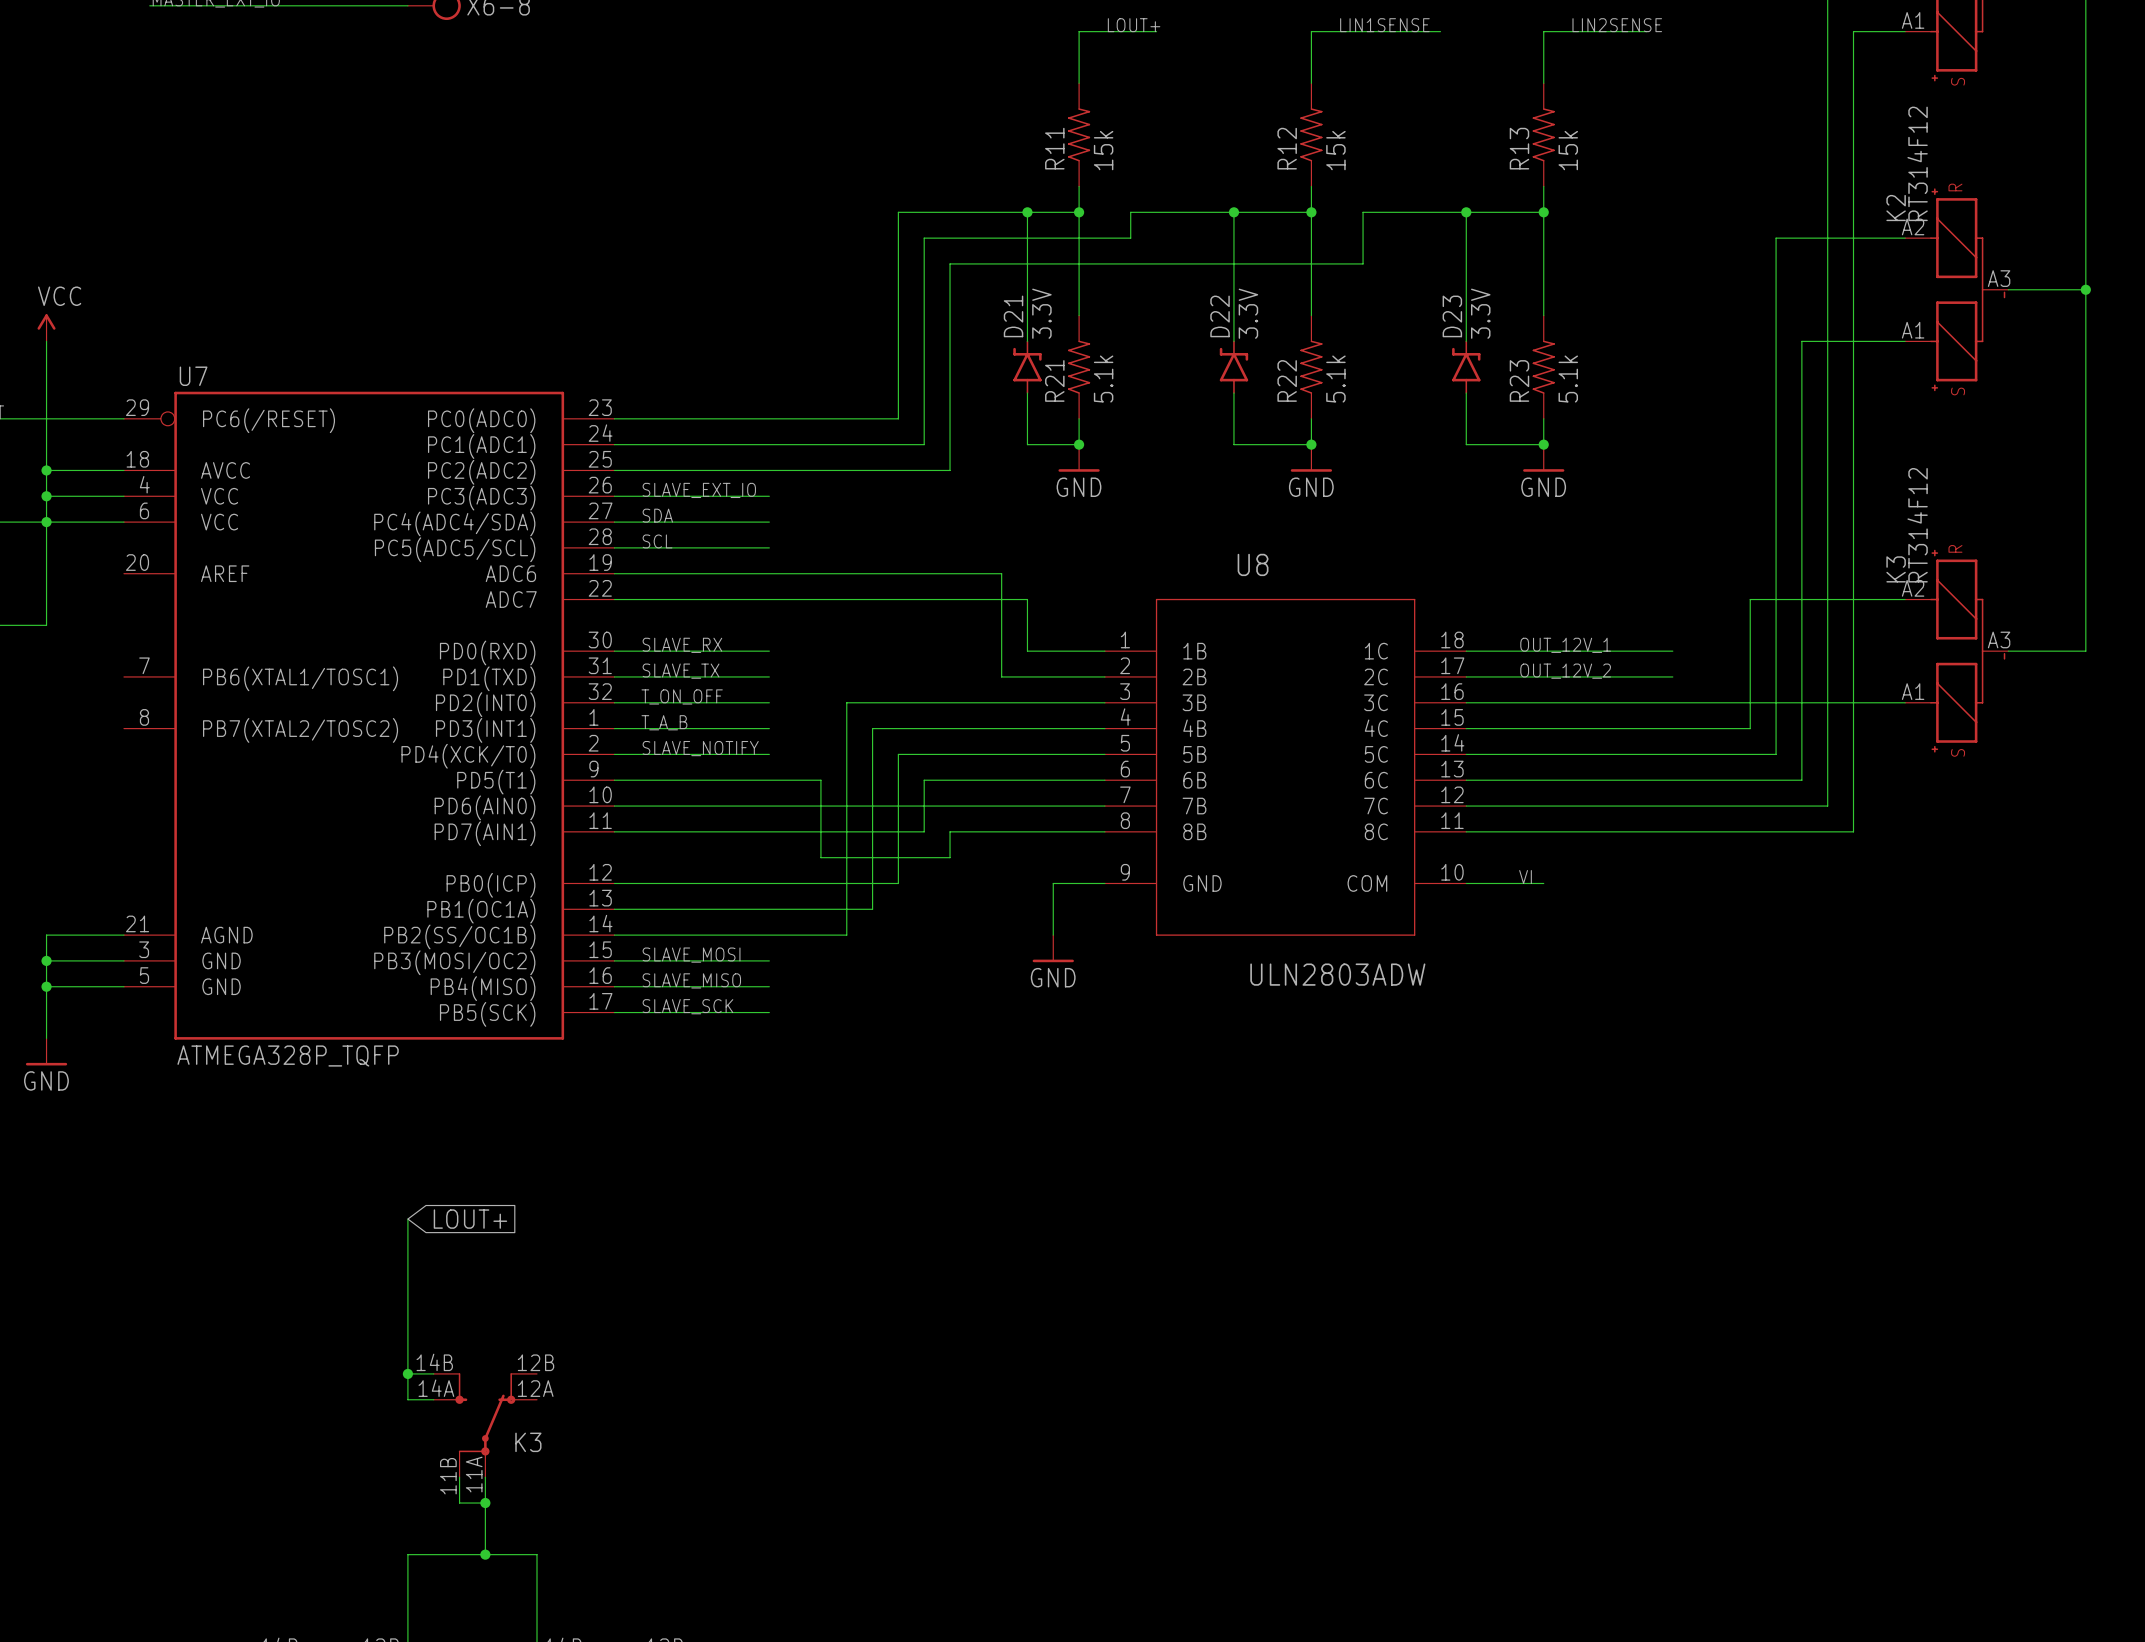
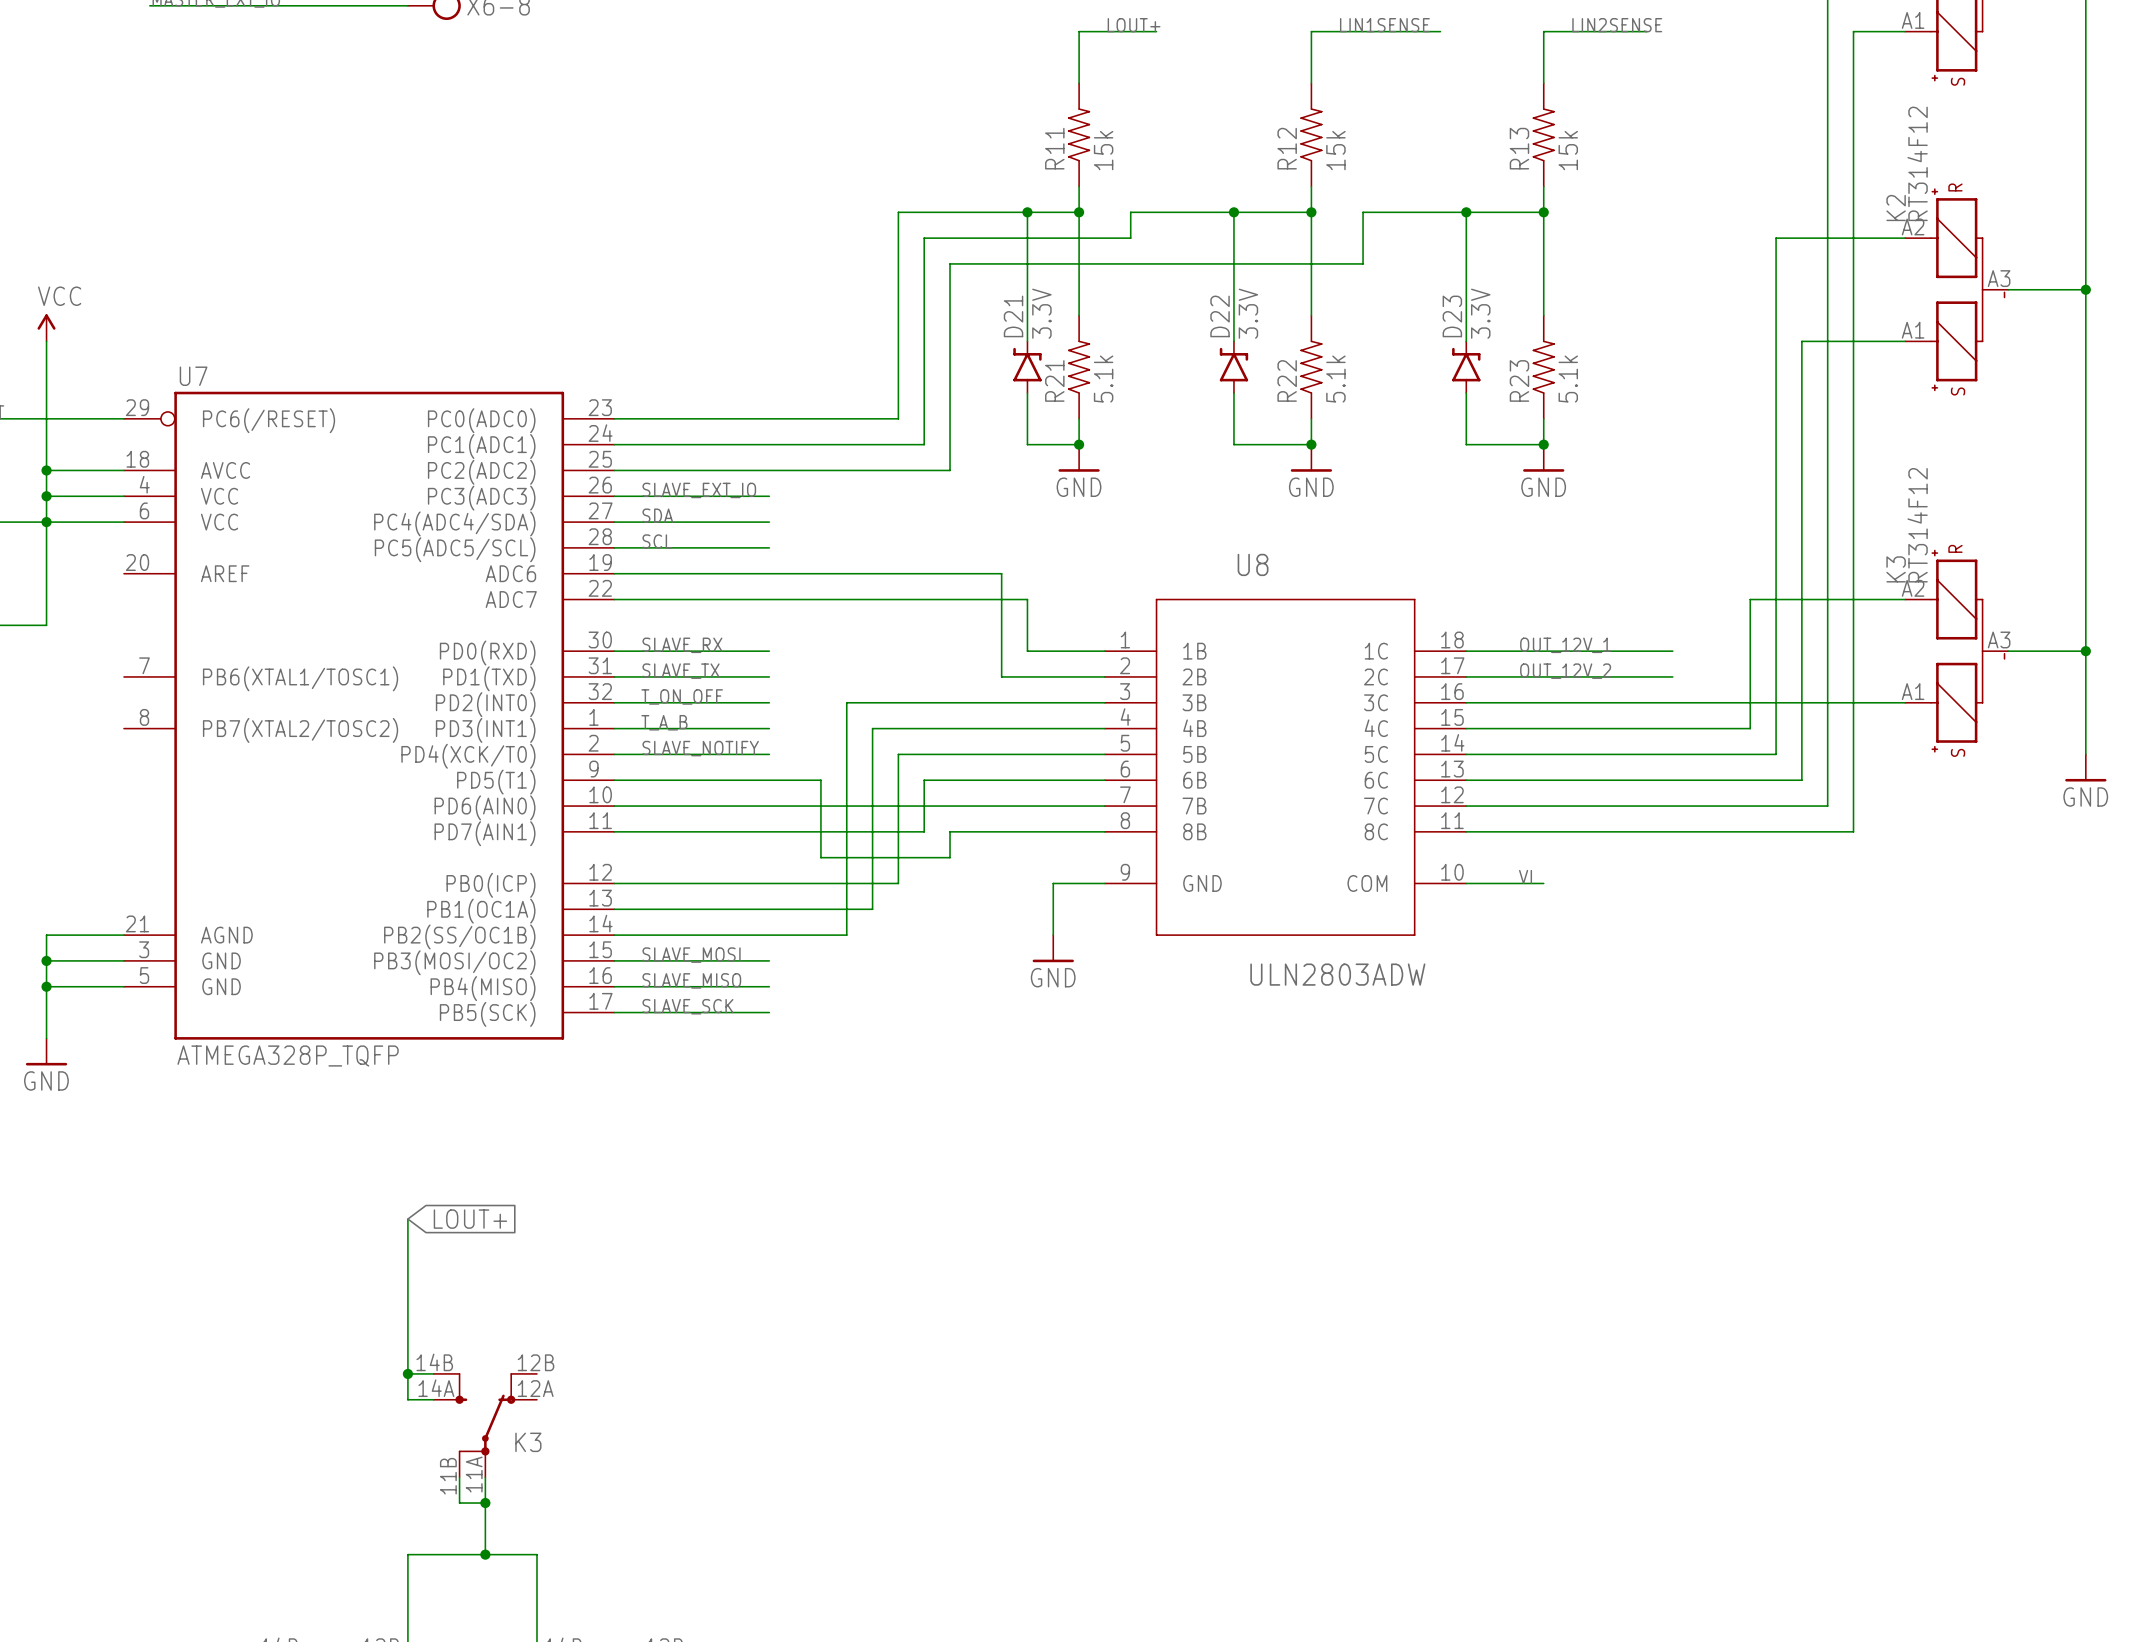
wire: none -> (2085, 651) (2085, 754)
junction: none -> (2085, 651)
power symbol: none -> GND (2085, 767)

